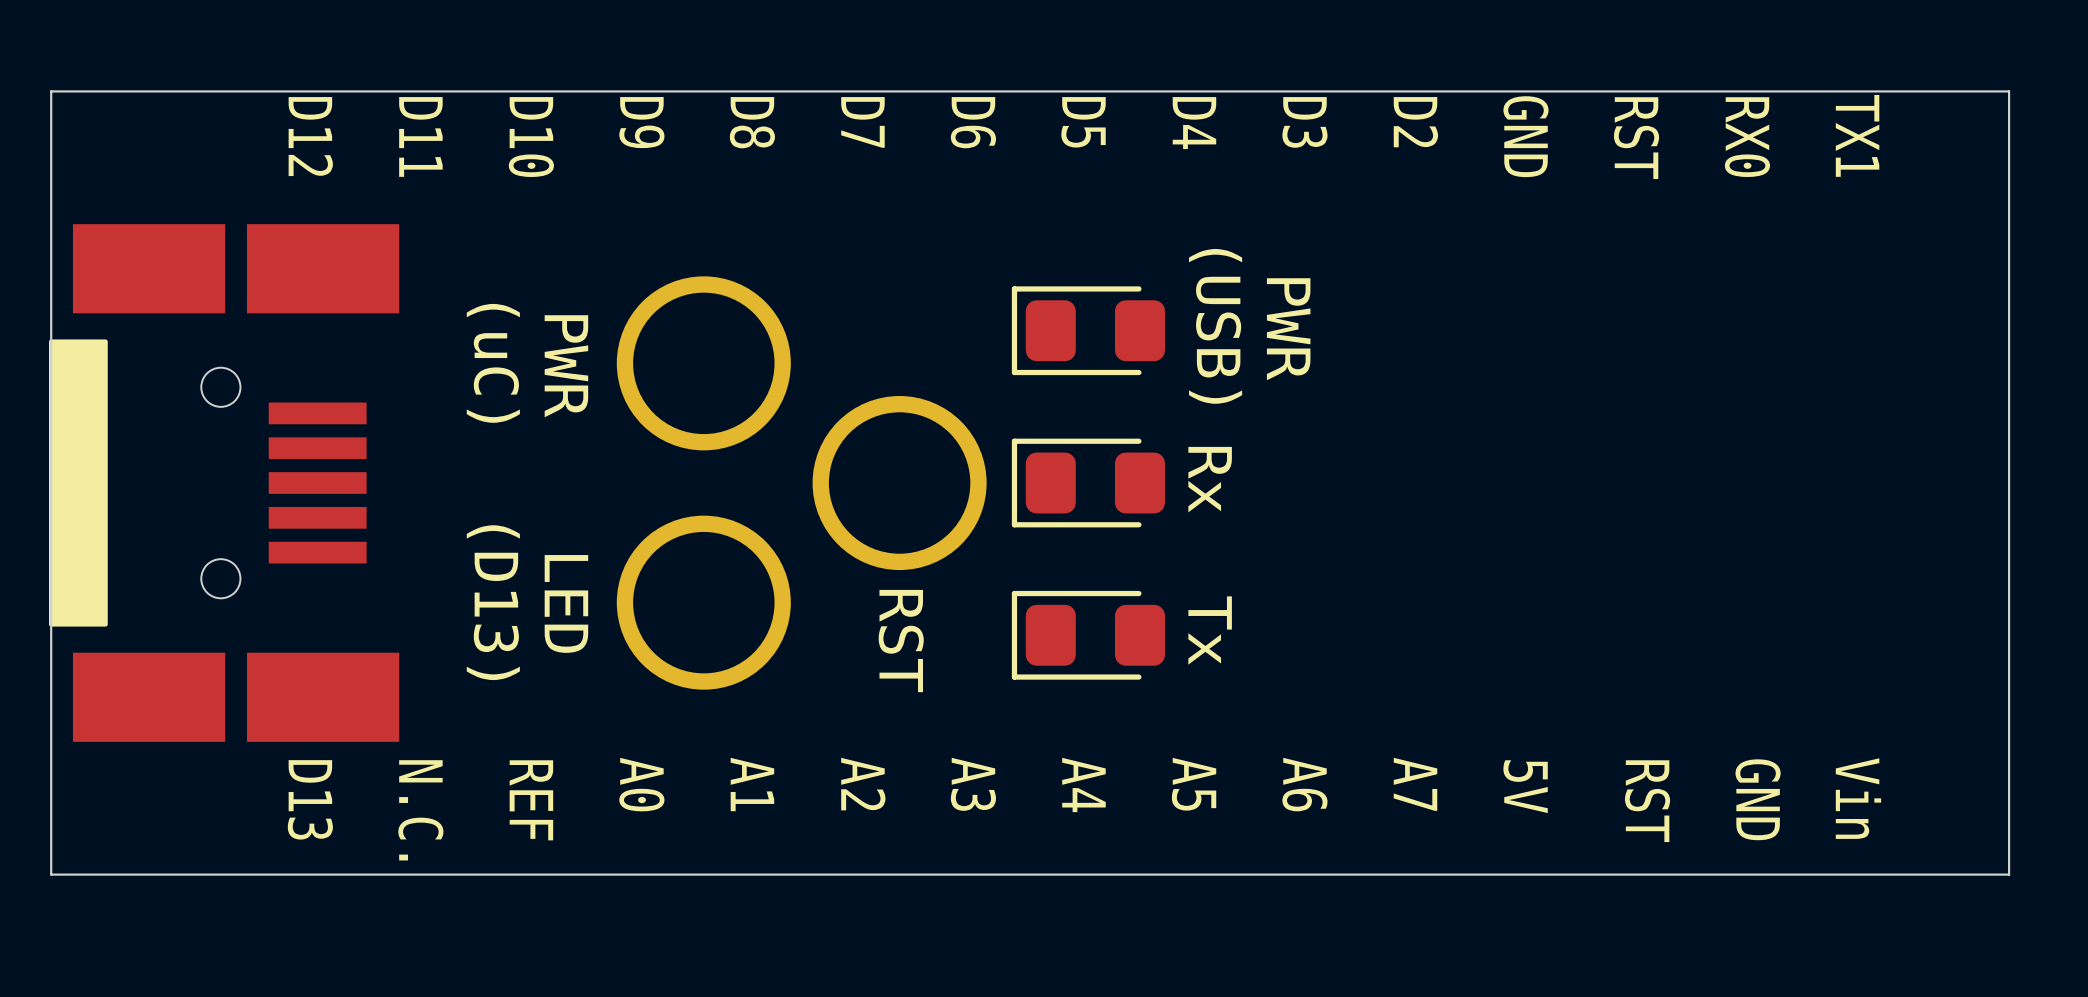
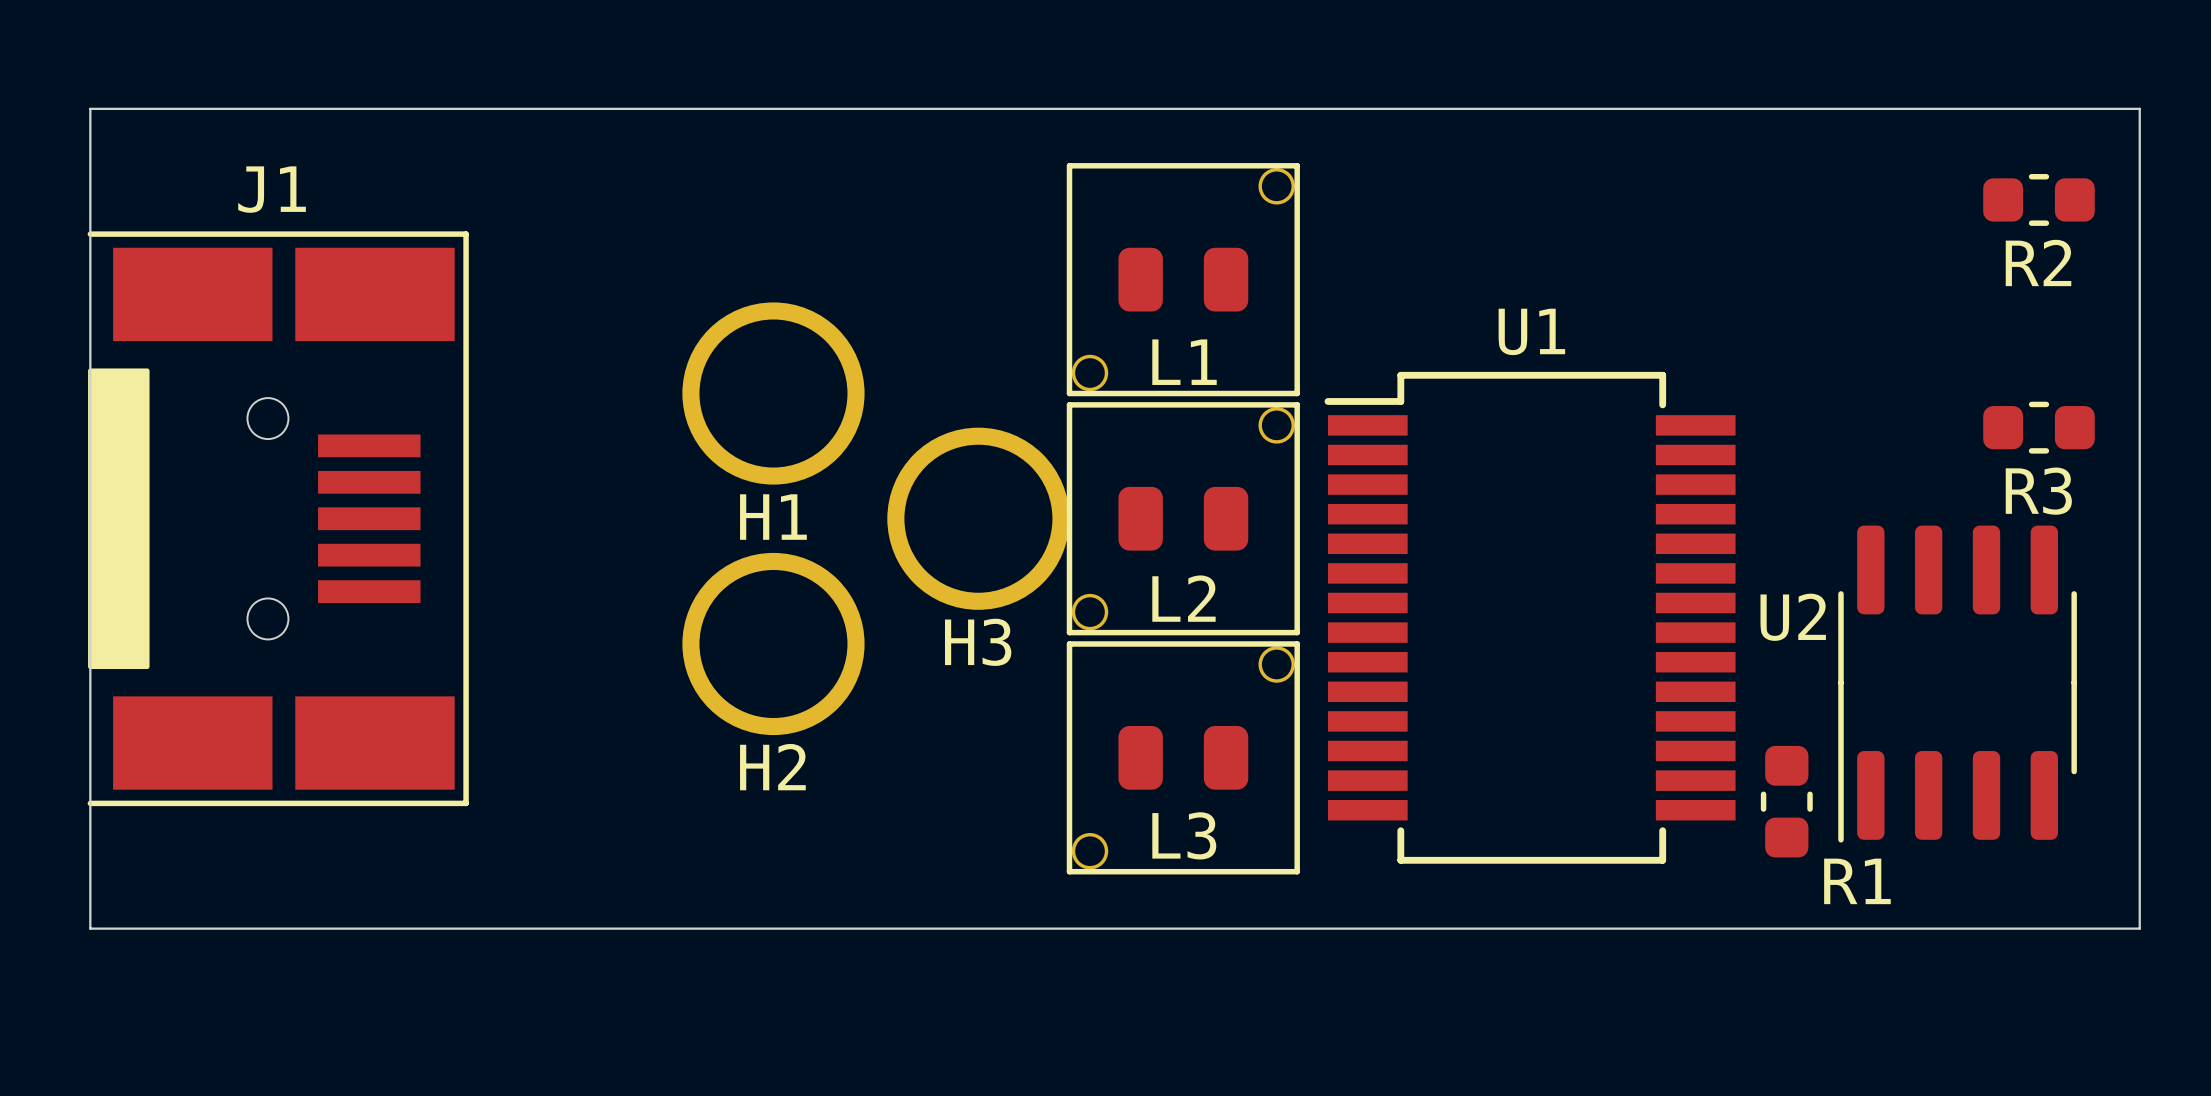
drawing: [287, 94, 1882, 861] -> none
R2: none -> (2038, 199)
L1: none -> (1183, 279)
text: (USB) (1215, 326) -> none
text: PWR (1288, 329) -> none
part: (1088, 330) -> none
text: (uC) (493, 363) -> none
text: PWR (566, 366) -> none
R3: none -> (2038, 427)
text: Rx (1210, 479) -> none
H1 name: none -> H1 (773, 517)
J1: none -> (278, 518)
part: (1088, 483) -> none
L2: none -> (1183, 518)
U1: none -> (1530, 617)
H3 name: none -> H3 (978, 642)
text: (D13) (493, 602) -> none
text: LED (566, 603) -> none
text: Tx (1210, 630) -> none
part: (1088, 635) -> none
U2: none -> (1957, 684)
text: RST (901, 641) -> none
L3: none -> (1183, 757)
H2 name: none -> H2 (772, 767)
R1: none -> (1786, 801)

